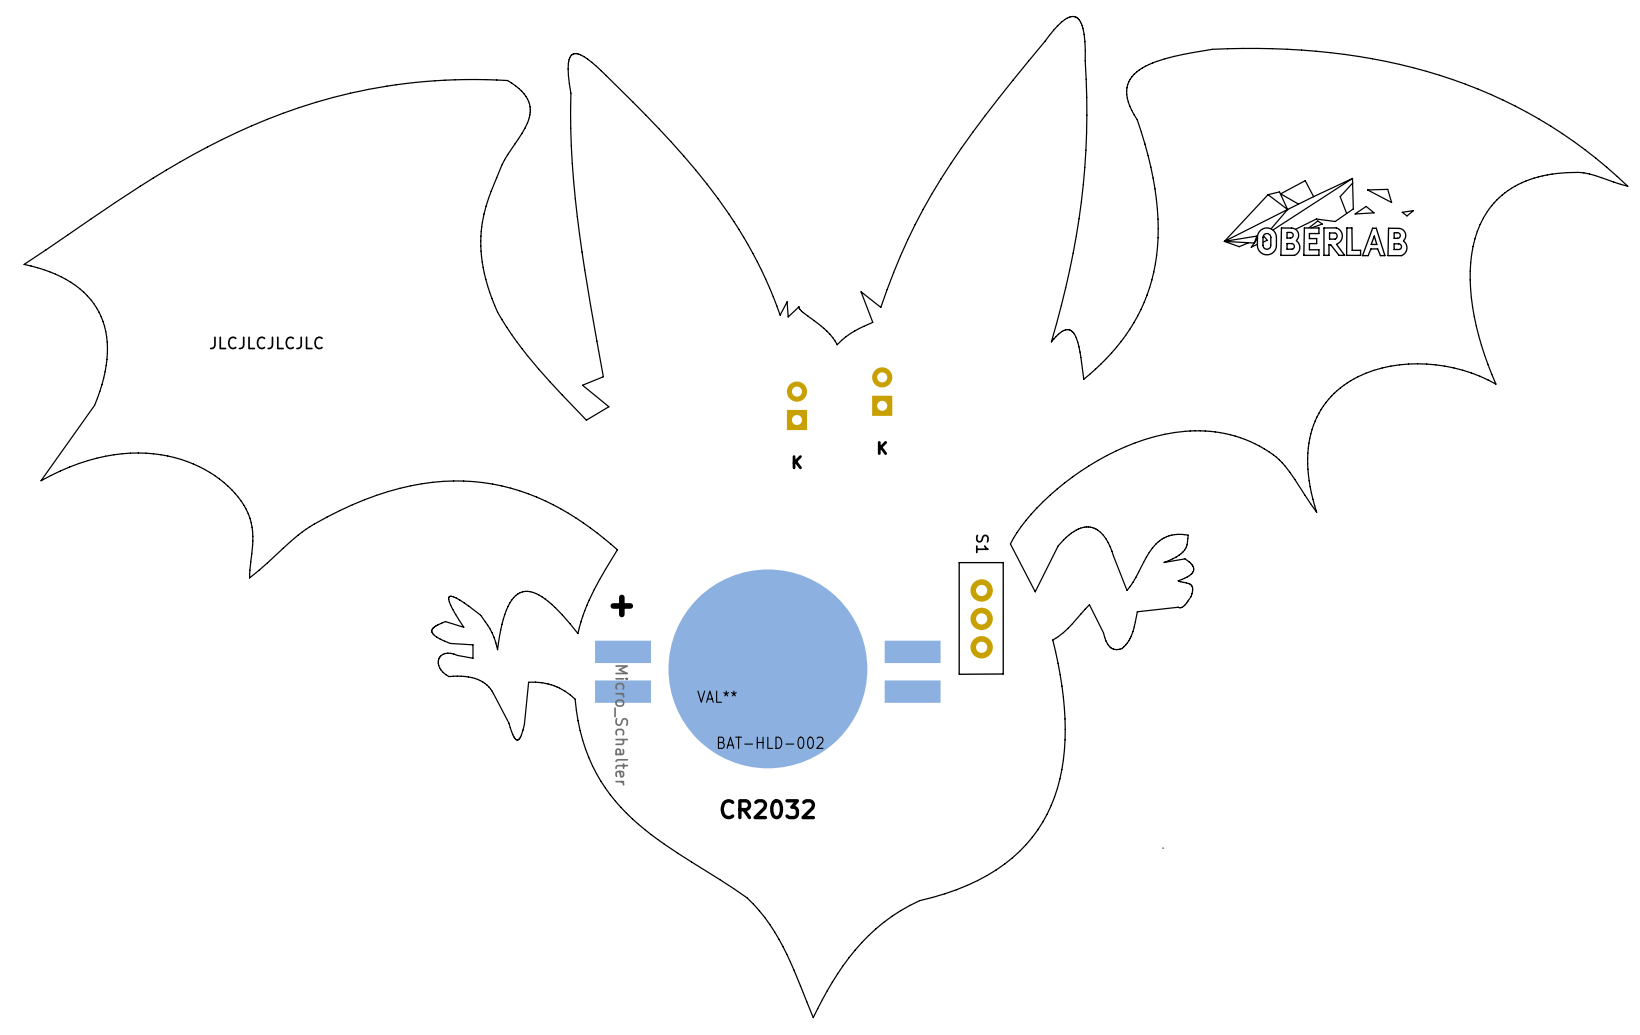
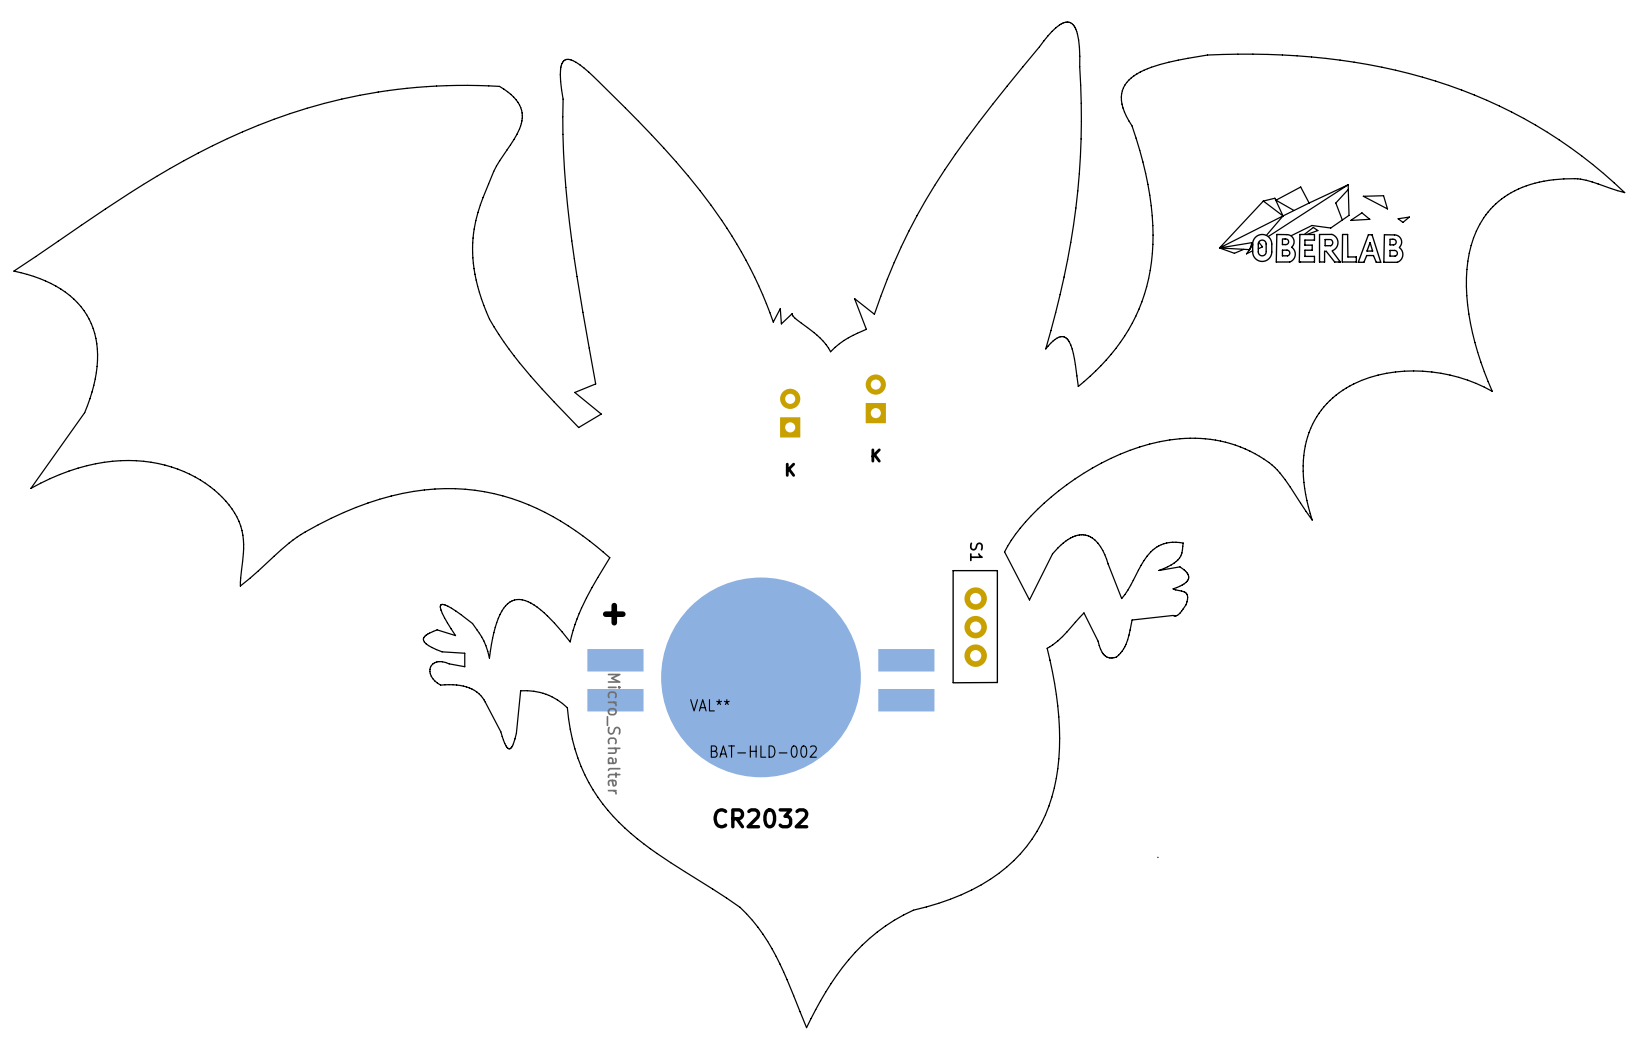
text: JLCJLCJLCJLC (266, 342) -> none

